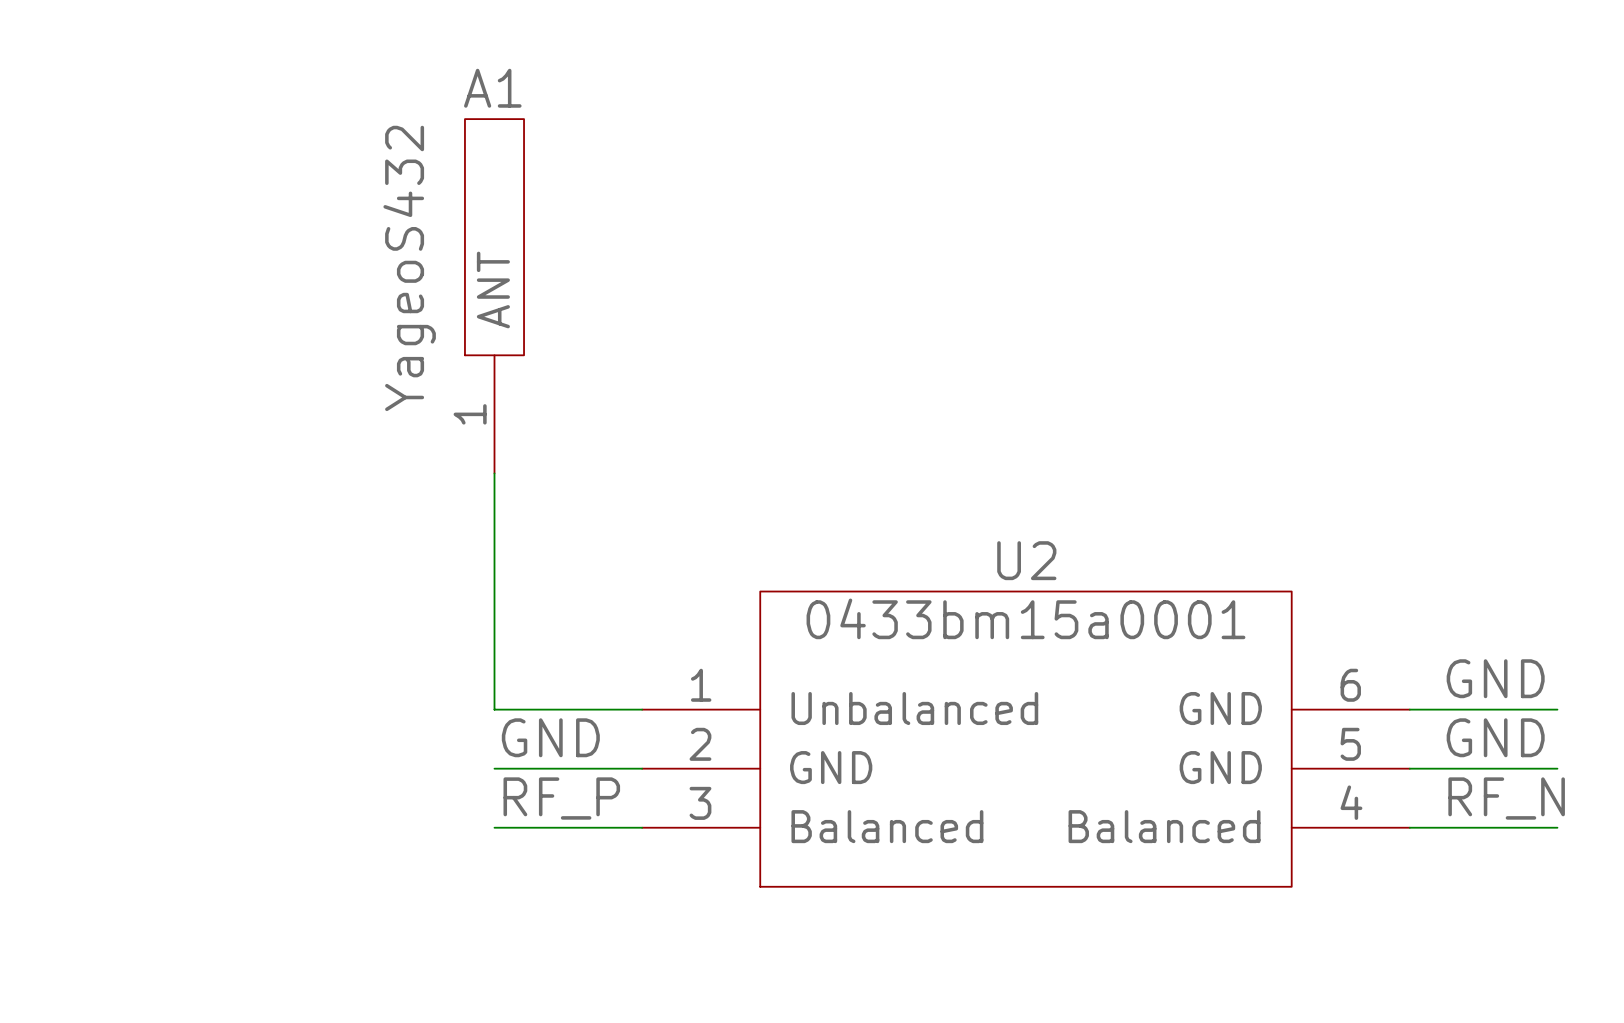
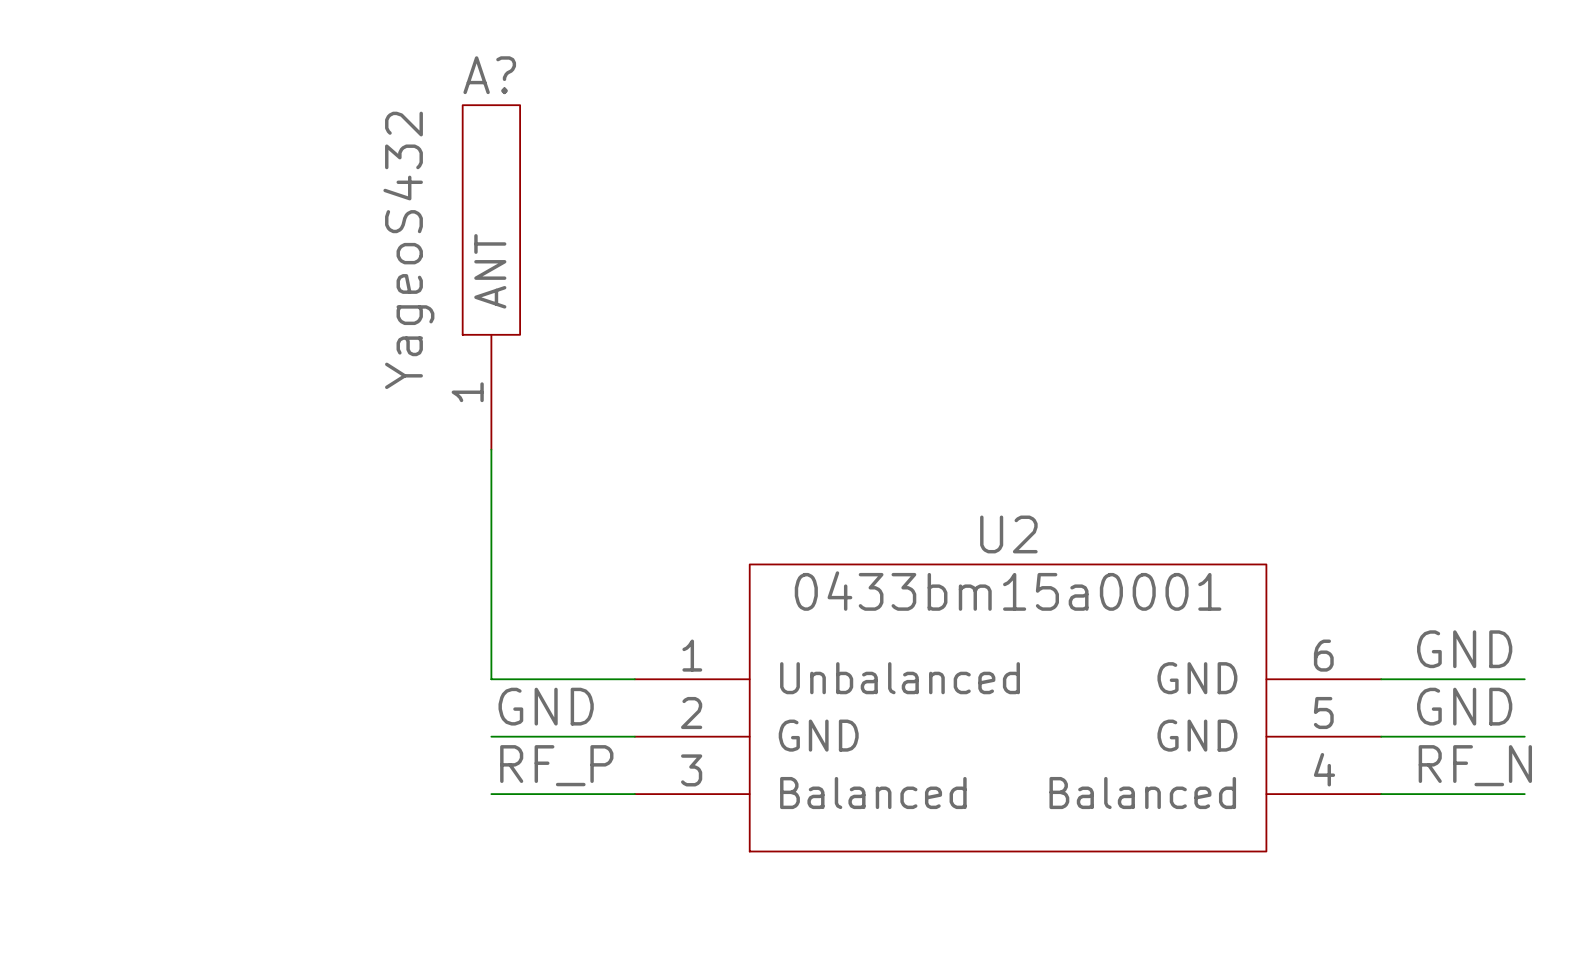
A1 name: A1 (492, 88) -> A? (489, 75)

